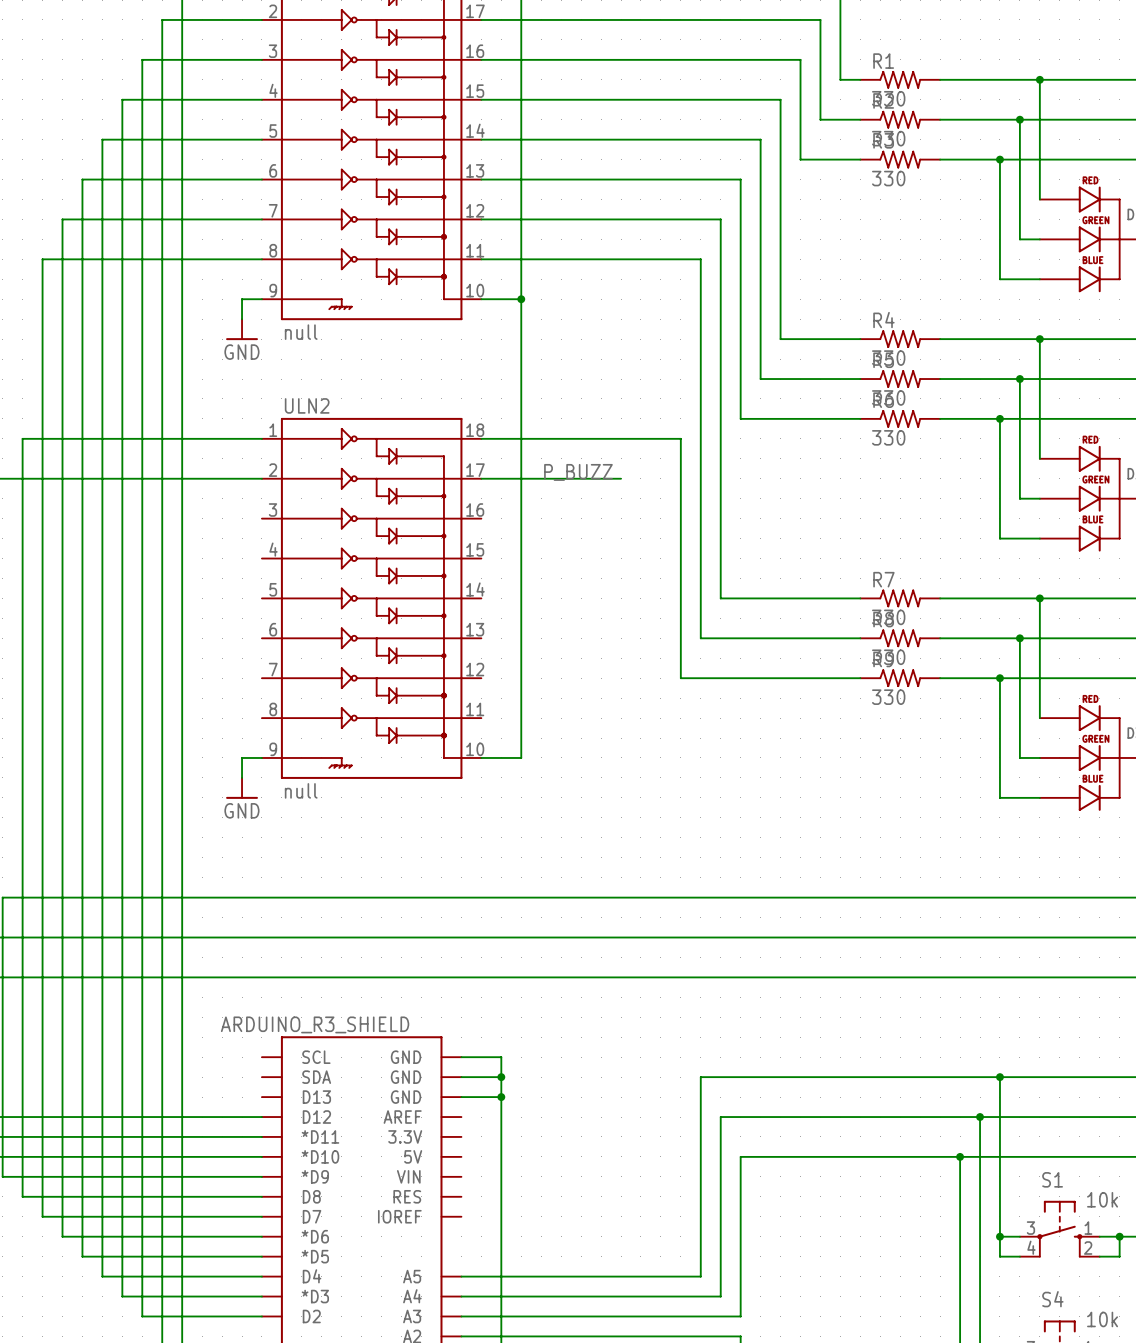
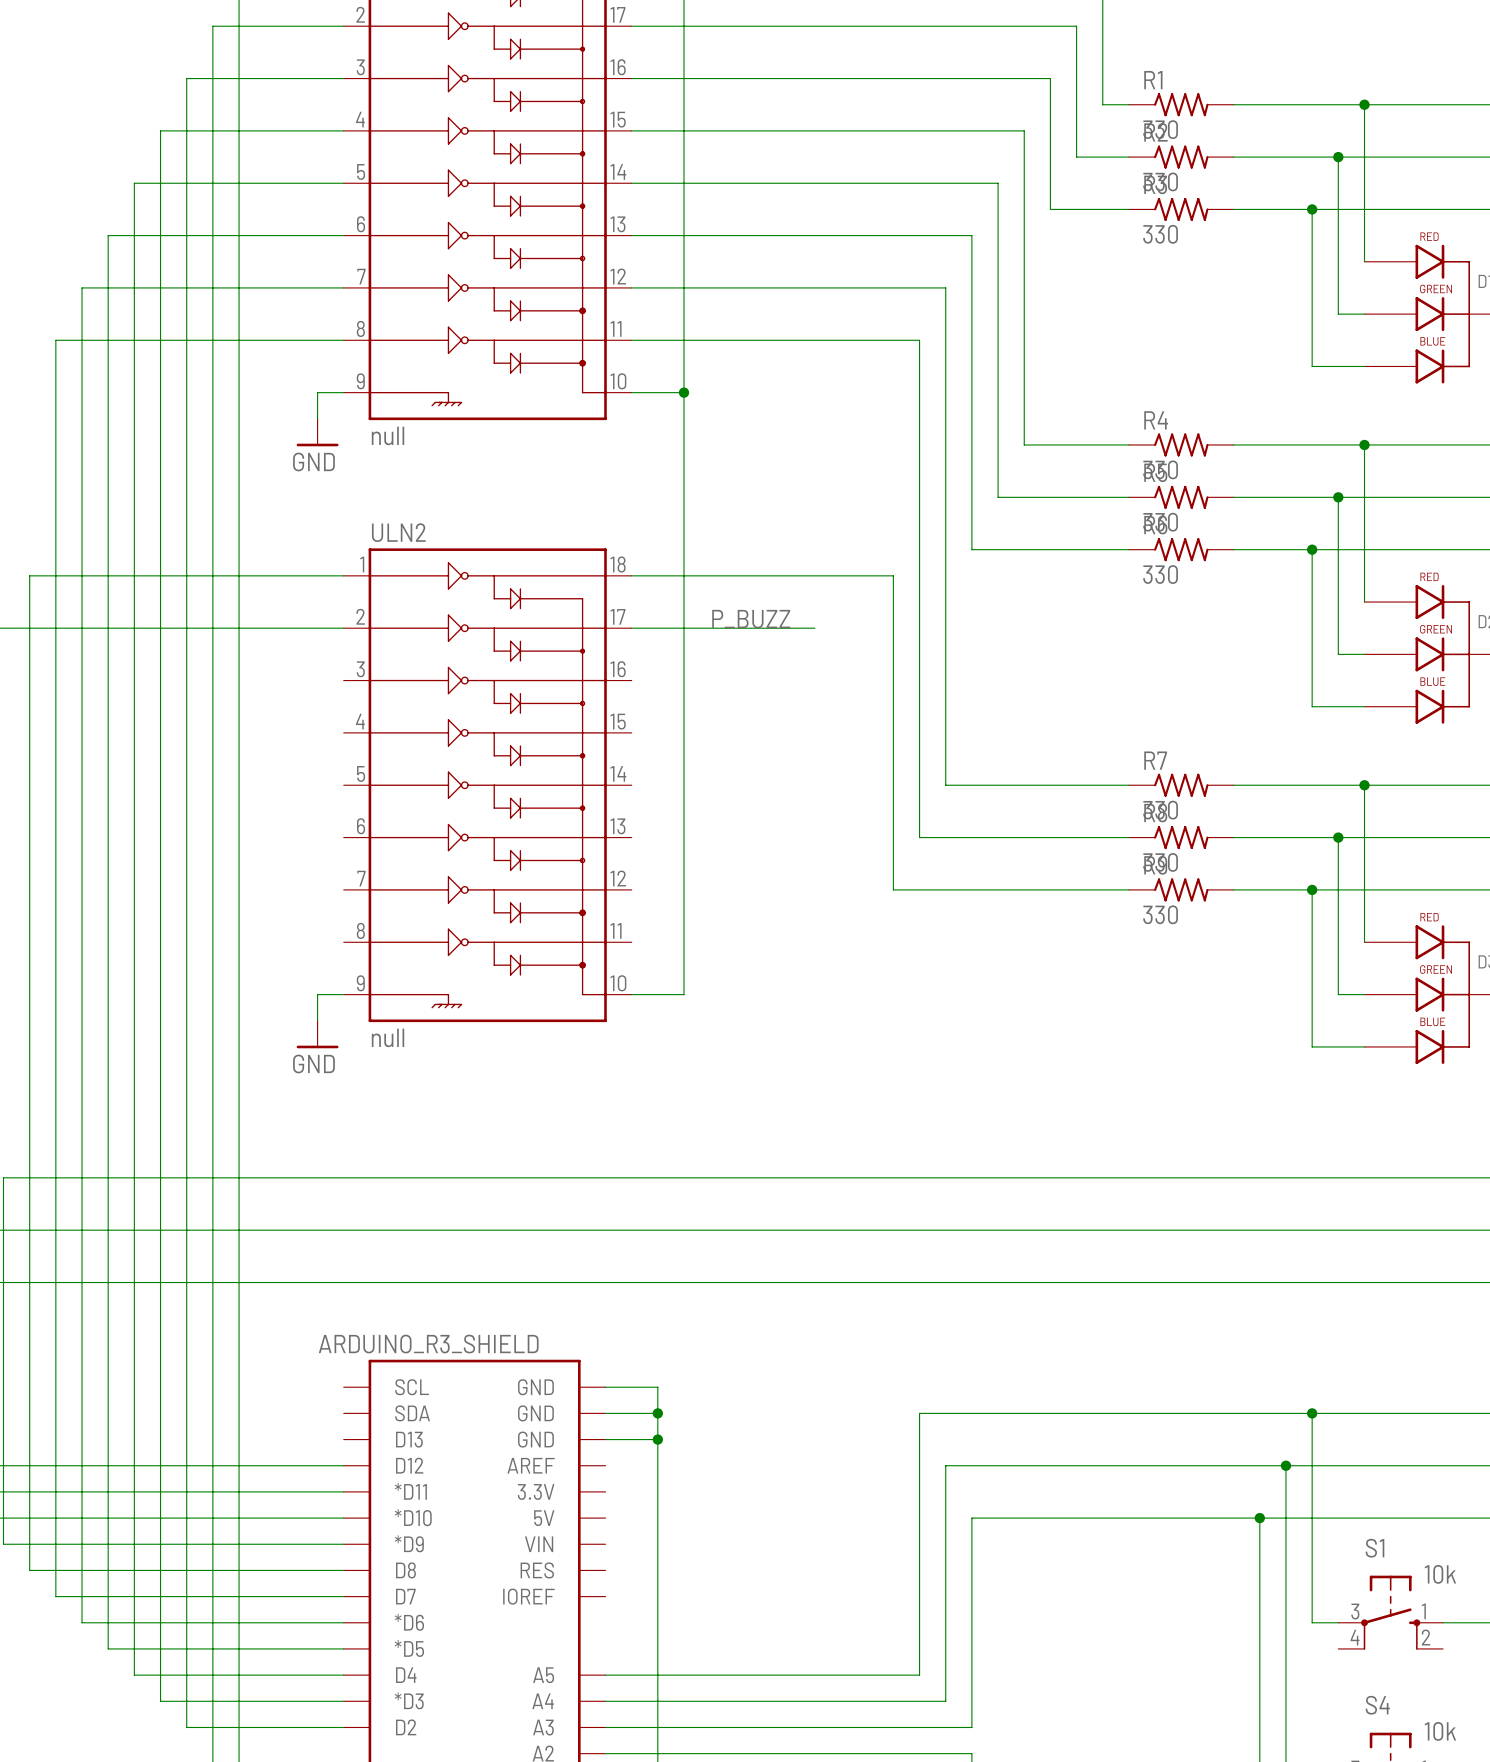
wire: (999, 1236) (999, 1256) (1019, 1256) -> none
junction: (999, 1236) -> none
wire: (1119, 1236) (1119, 1256) (1099, 1256) -> none
junction: (1119, 1236) -> none

